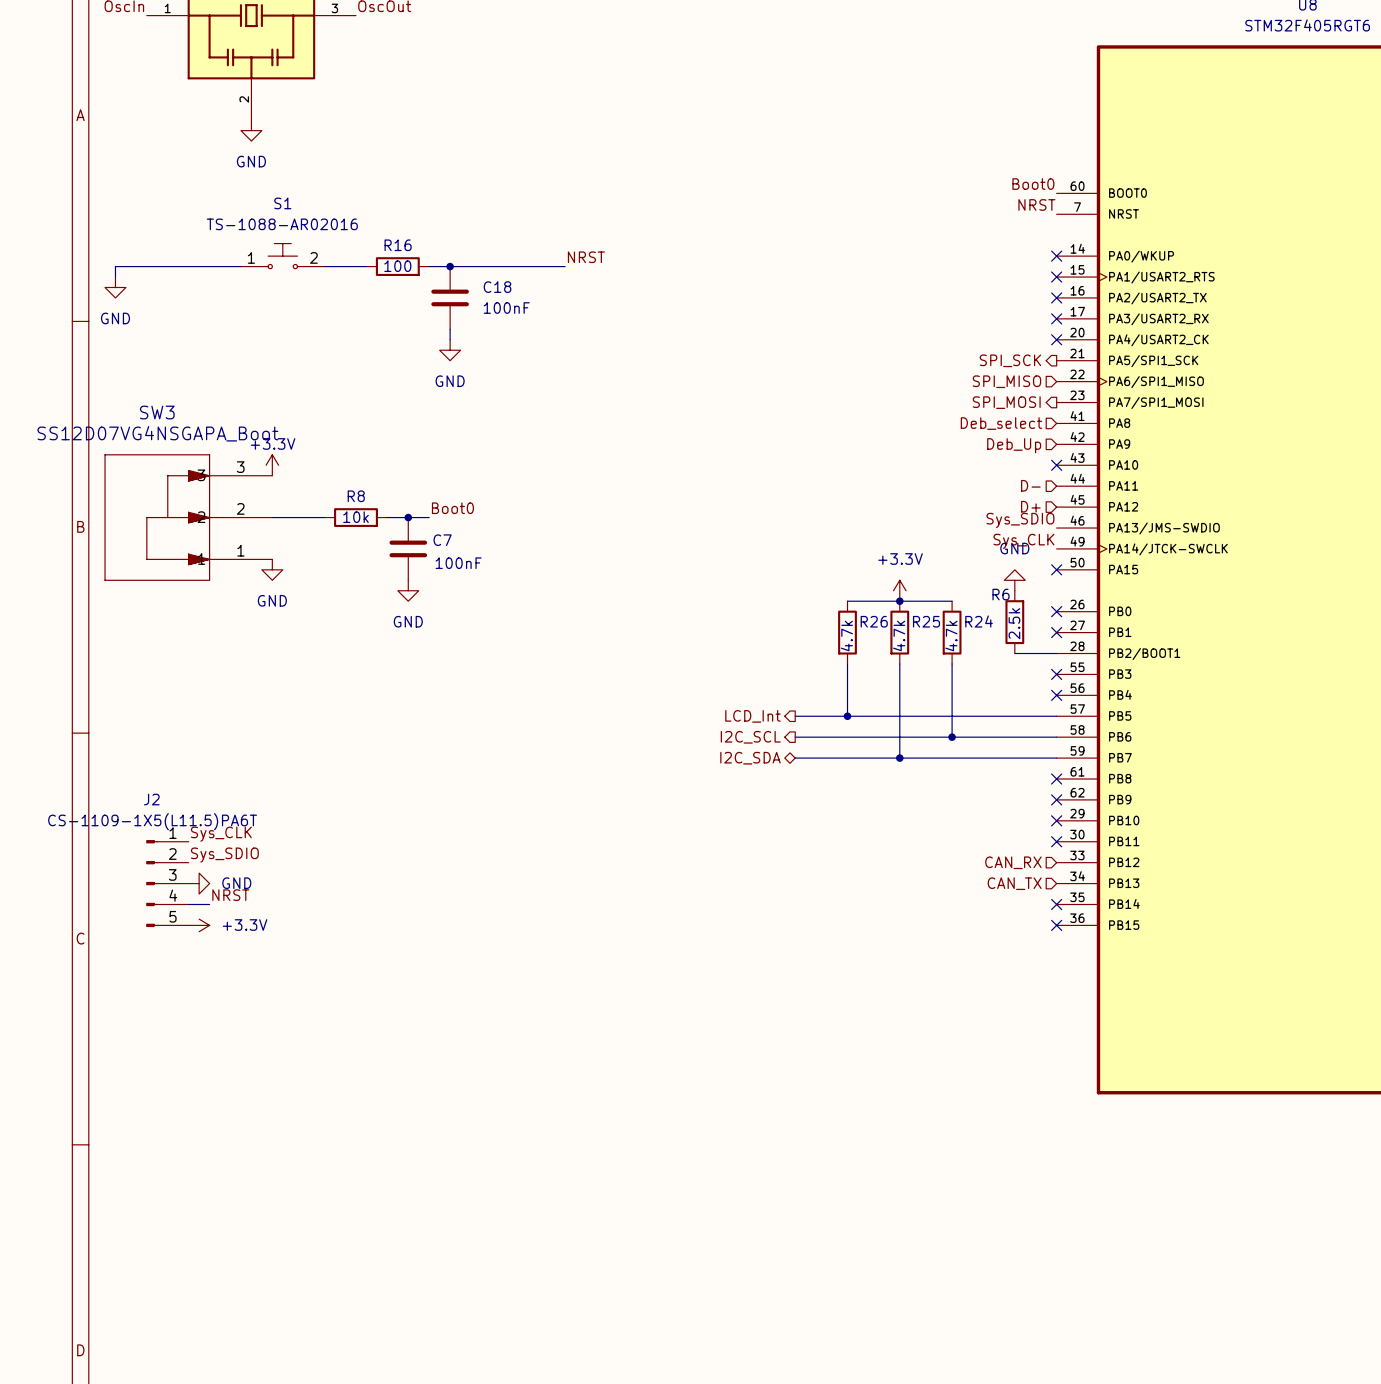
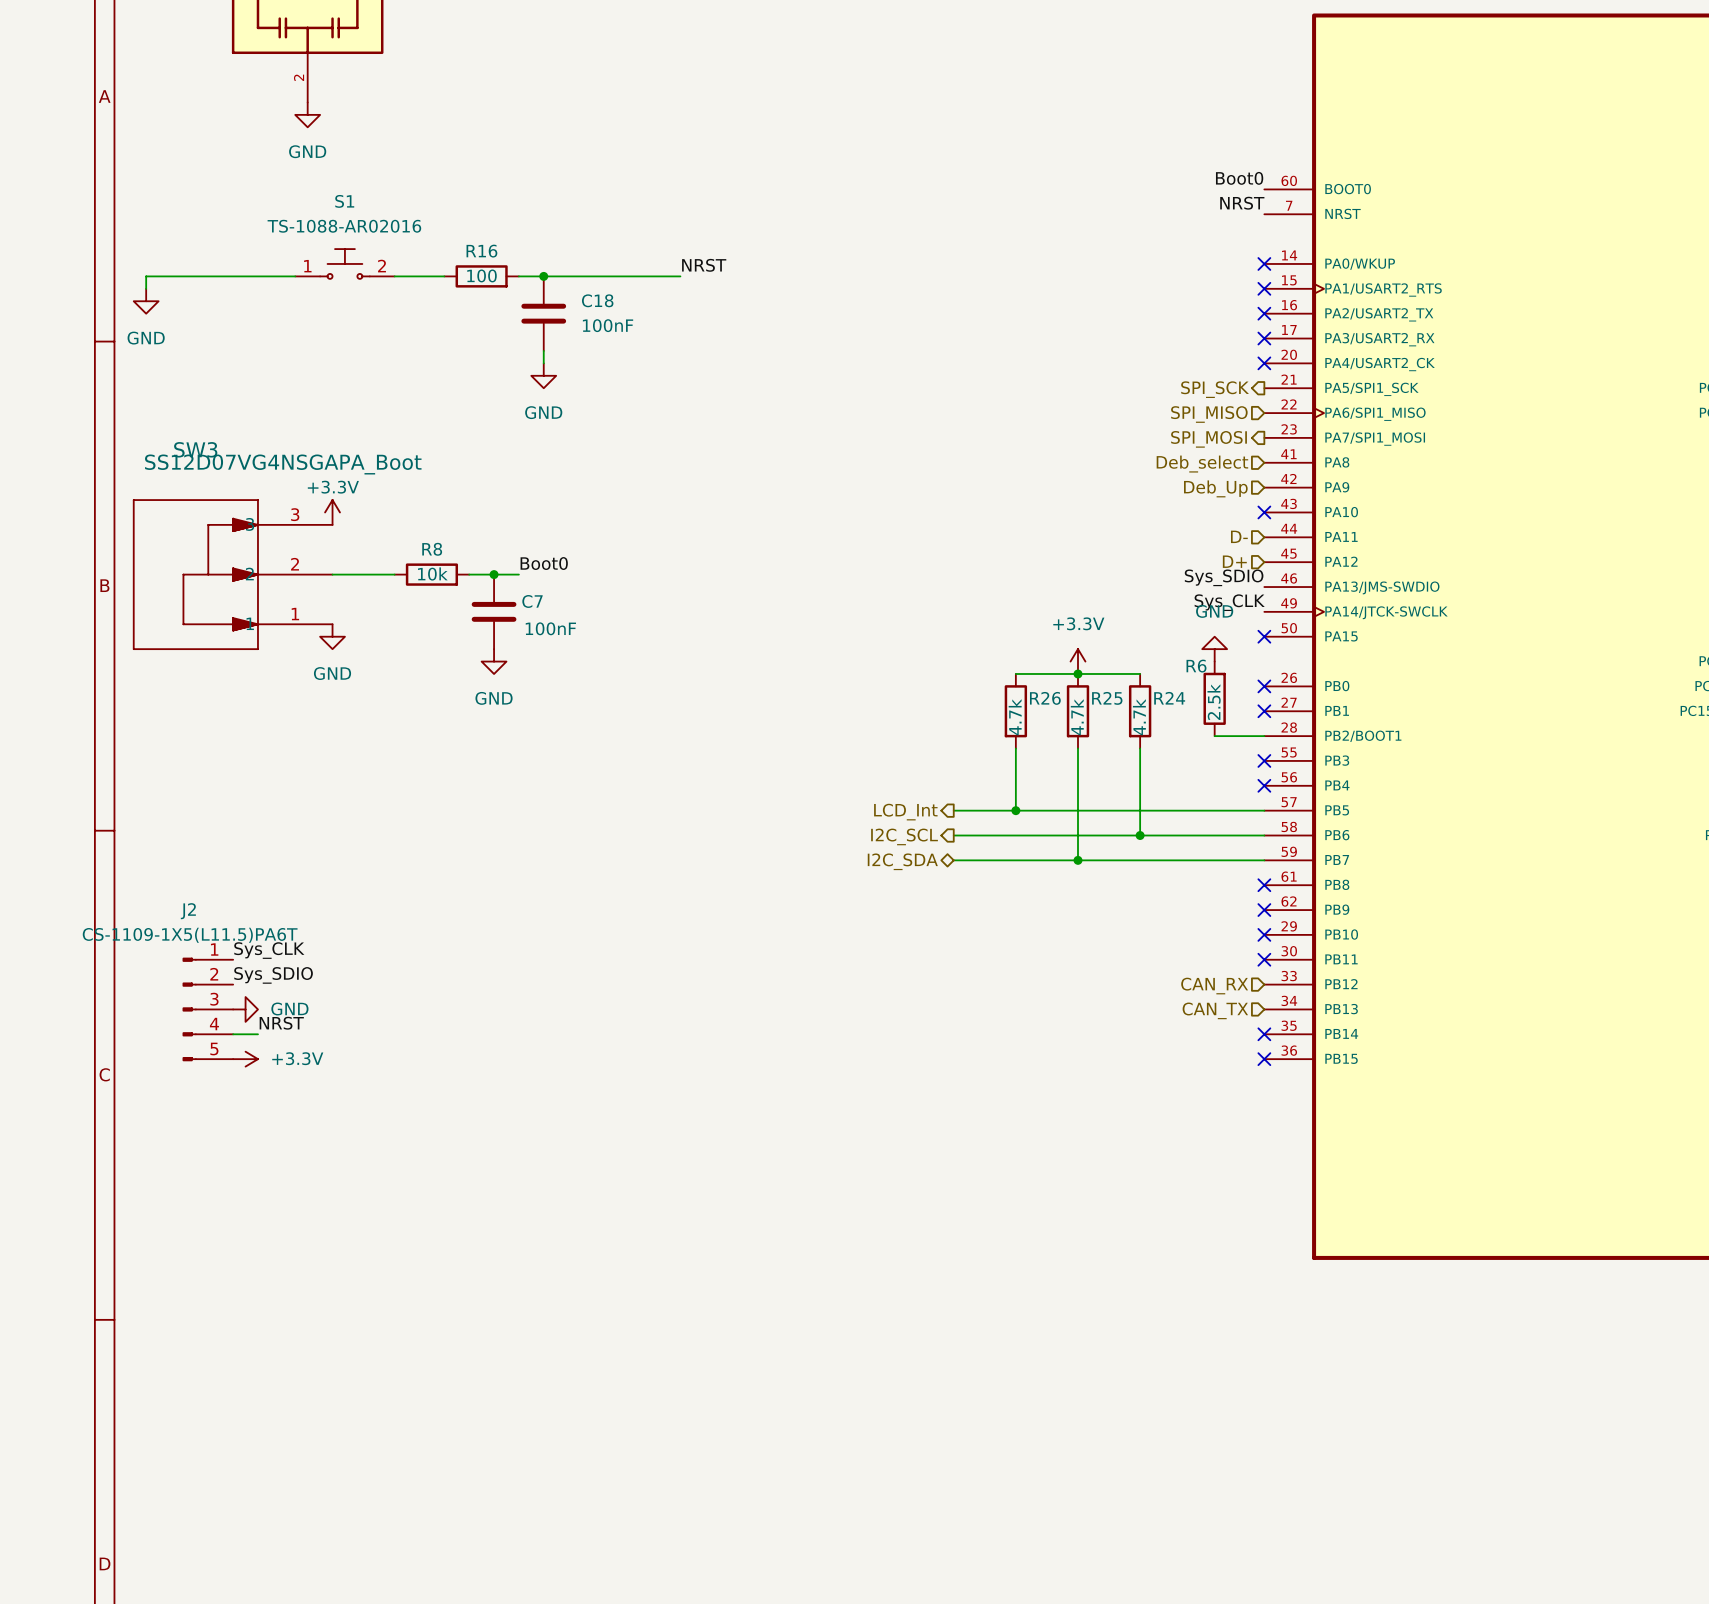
SW3 value position: SS12D07VG4NSGAPA_Boot (157, 433) -> SS12D07VG4NSGAPA_Boot (283, 464)

